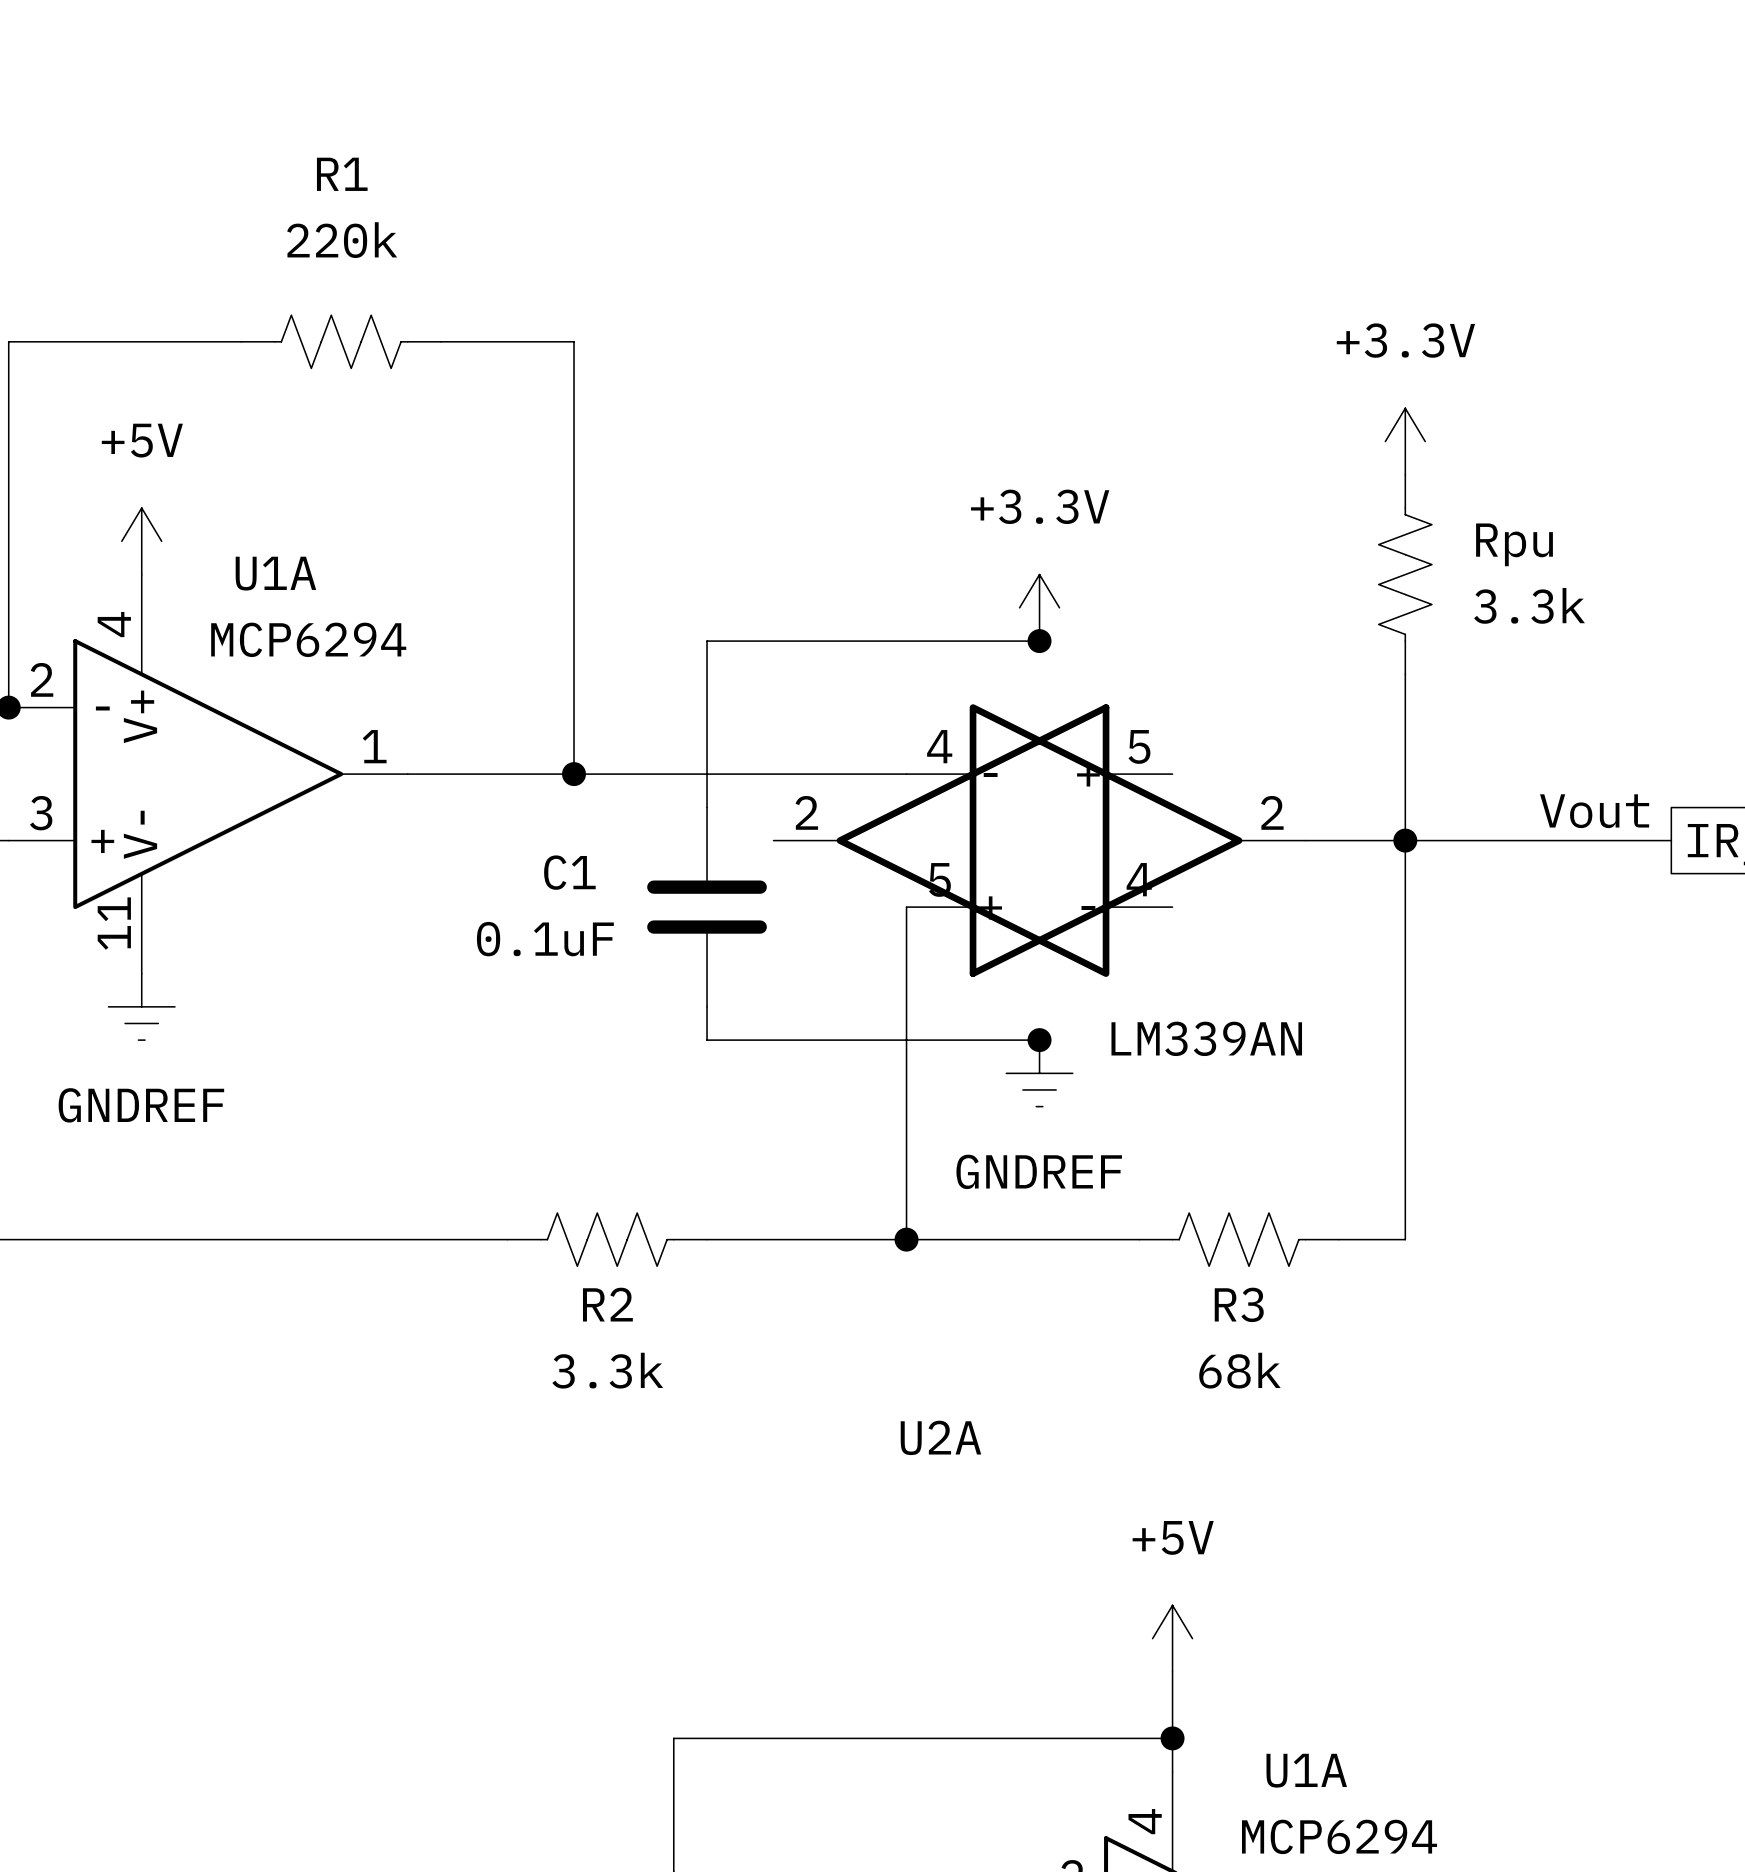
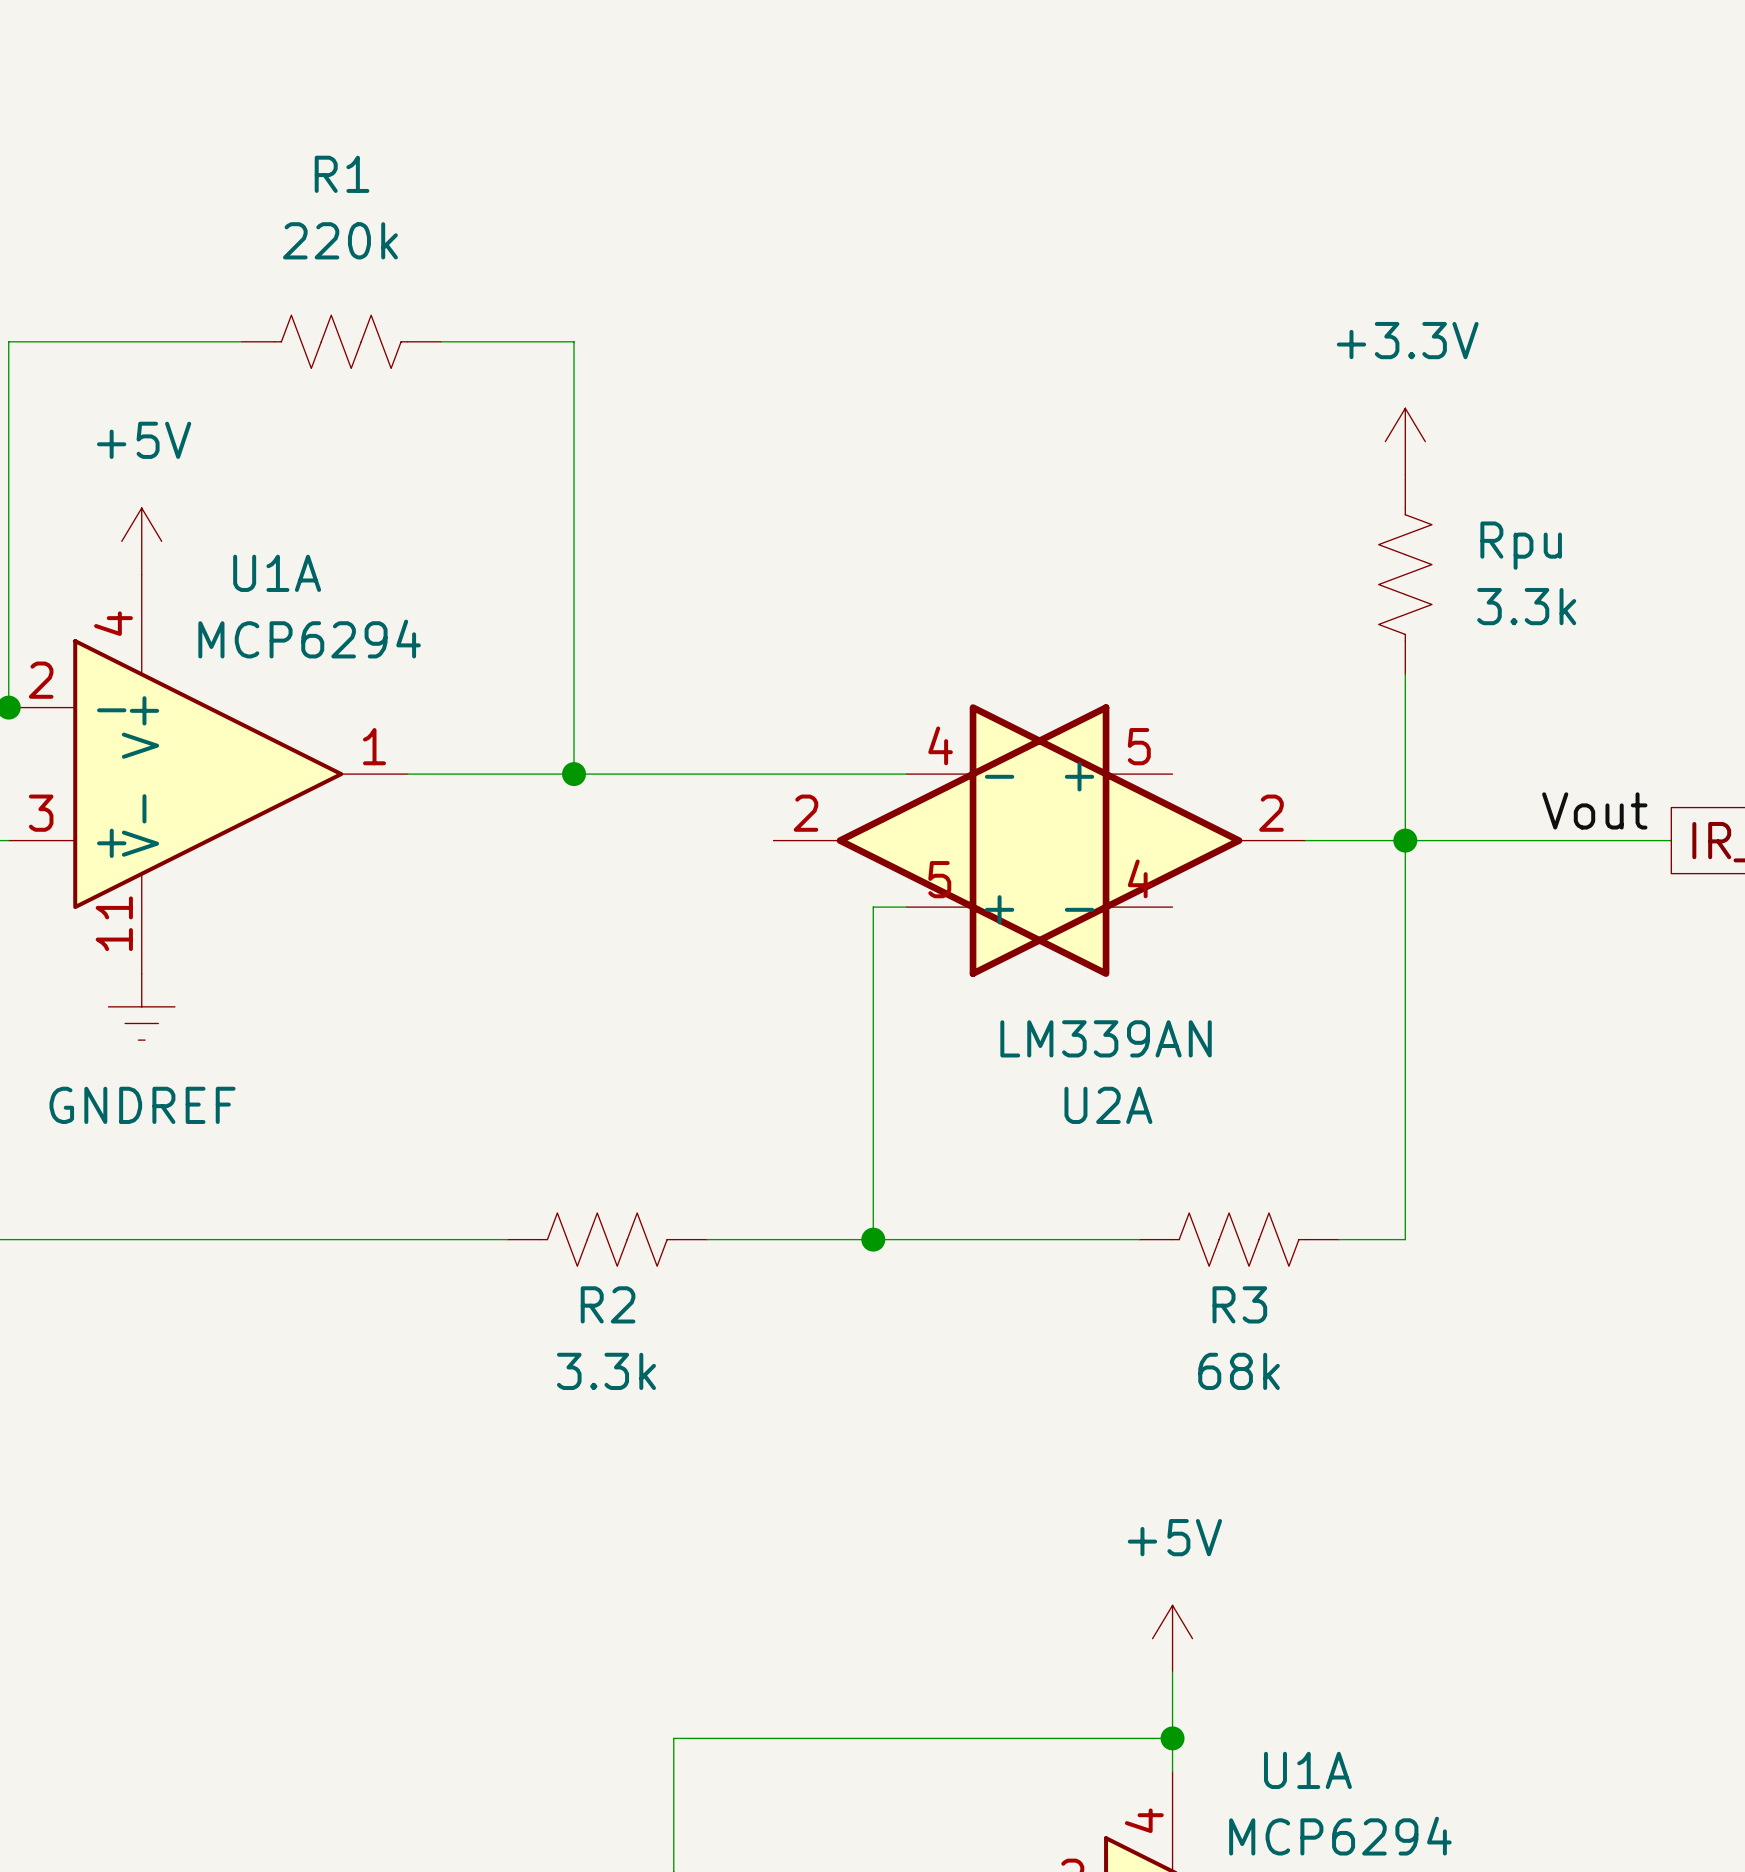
power symbol: +3.3V (1039, 607) -> none
wire: (1039, 641) (707, 641) (707, 807) -> none
junction: (1039, 641) -> none
C1: 0.1uF (707, 907) -> none
wire: (906, 907) (906, 1239) -> (906, 907) (873, 907) (873, 1239)
wire: (707, 1006) (707, 1040) (1039, 1040) -> none
U2A value position: LM339AN (1206, 1038) -> LM339AN (1106, 1038)
junction: (1039, 1040) -> none
power symbol: GNDREF (1039, 1073) -> none
junction position: (906, 1239) -> (873, 1239)
U2A name position: U2A (940, 1437) -> U2A (1108, 1105)

